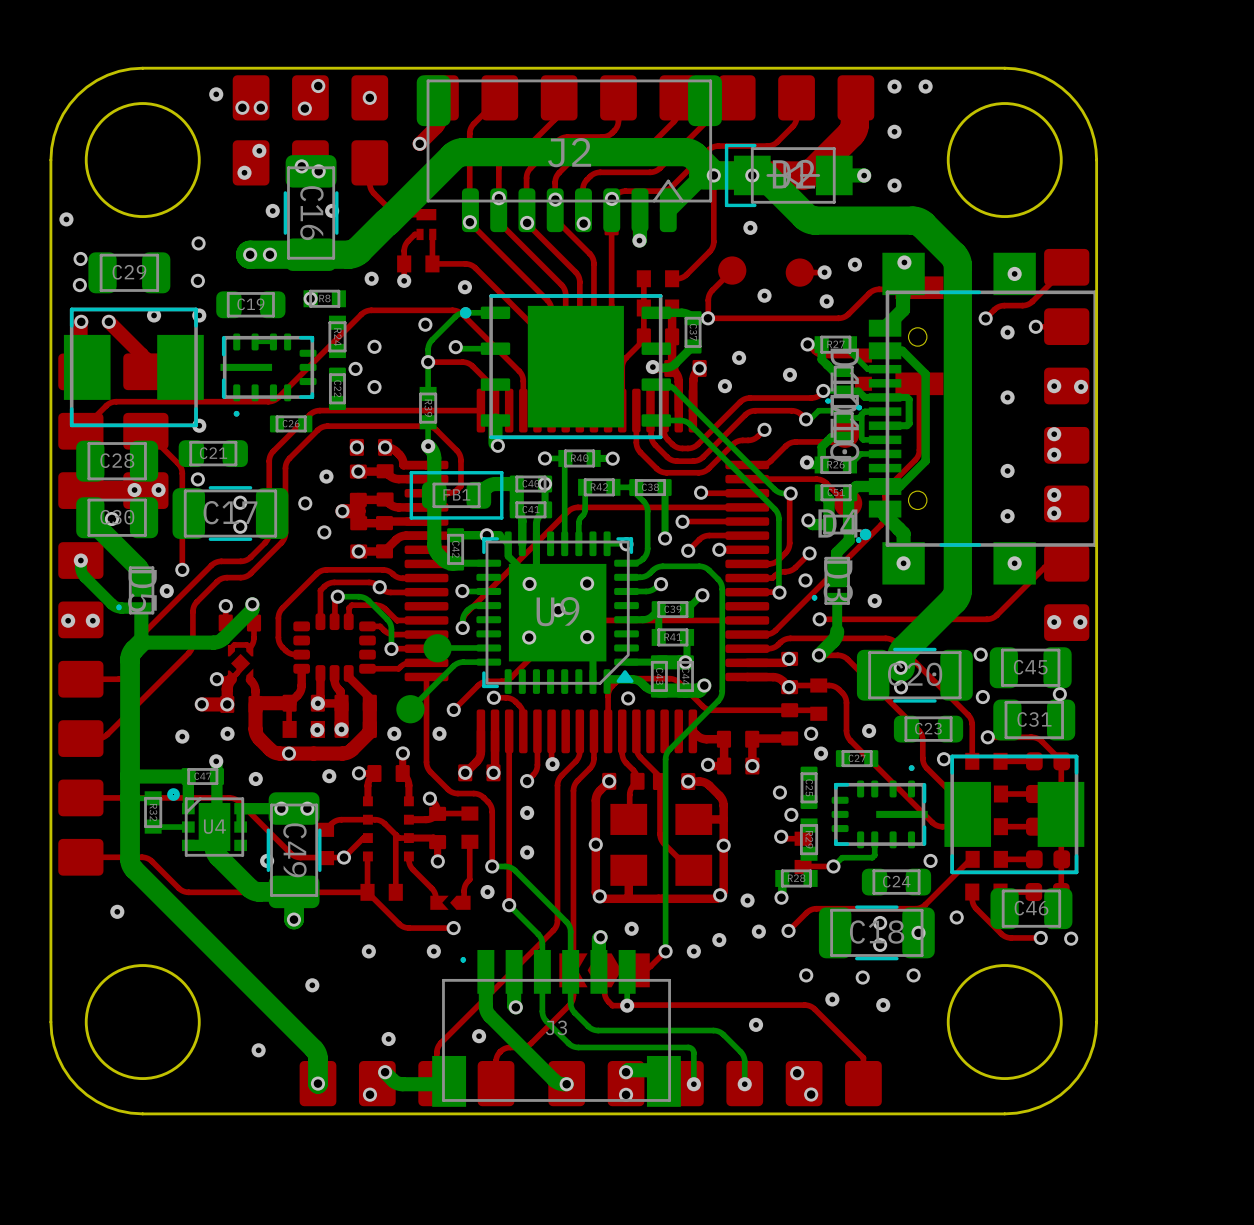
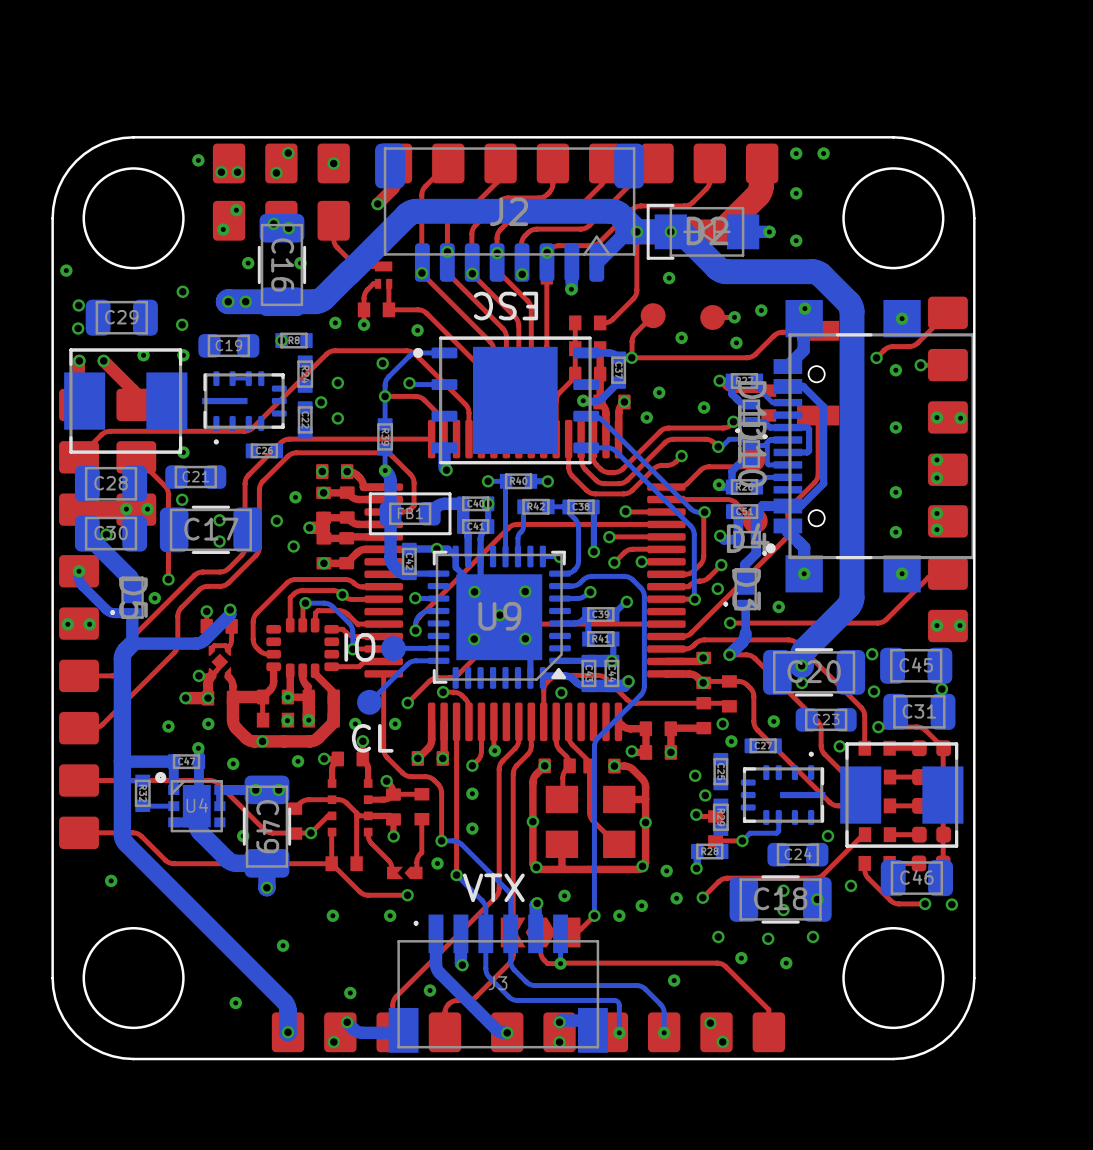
text: none -> ESC (505, 306)
text: none -> IO (359, 647)
text: none -> CL (372, 738)
text: none -> VTX (493, 887)

